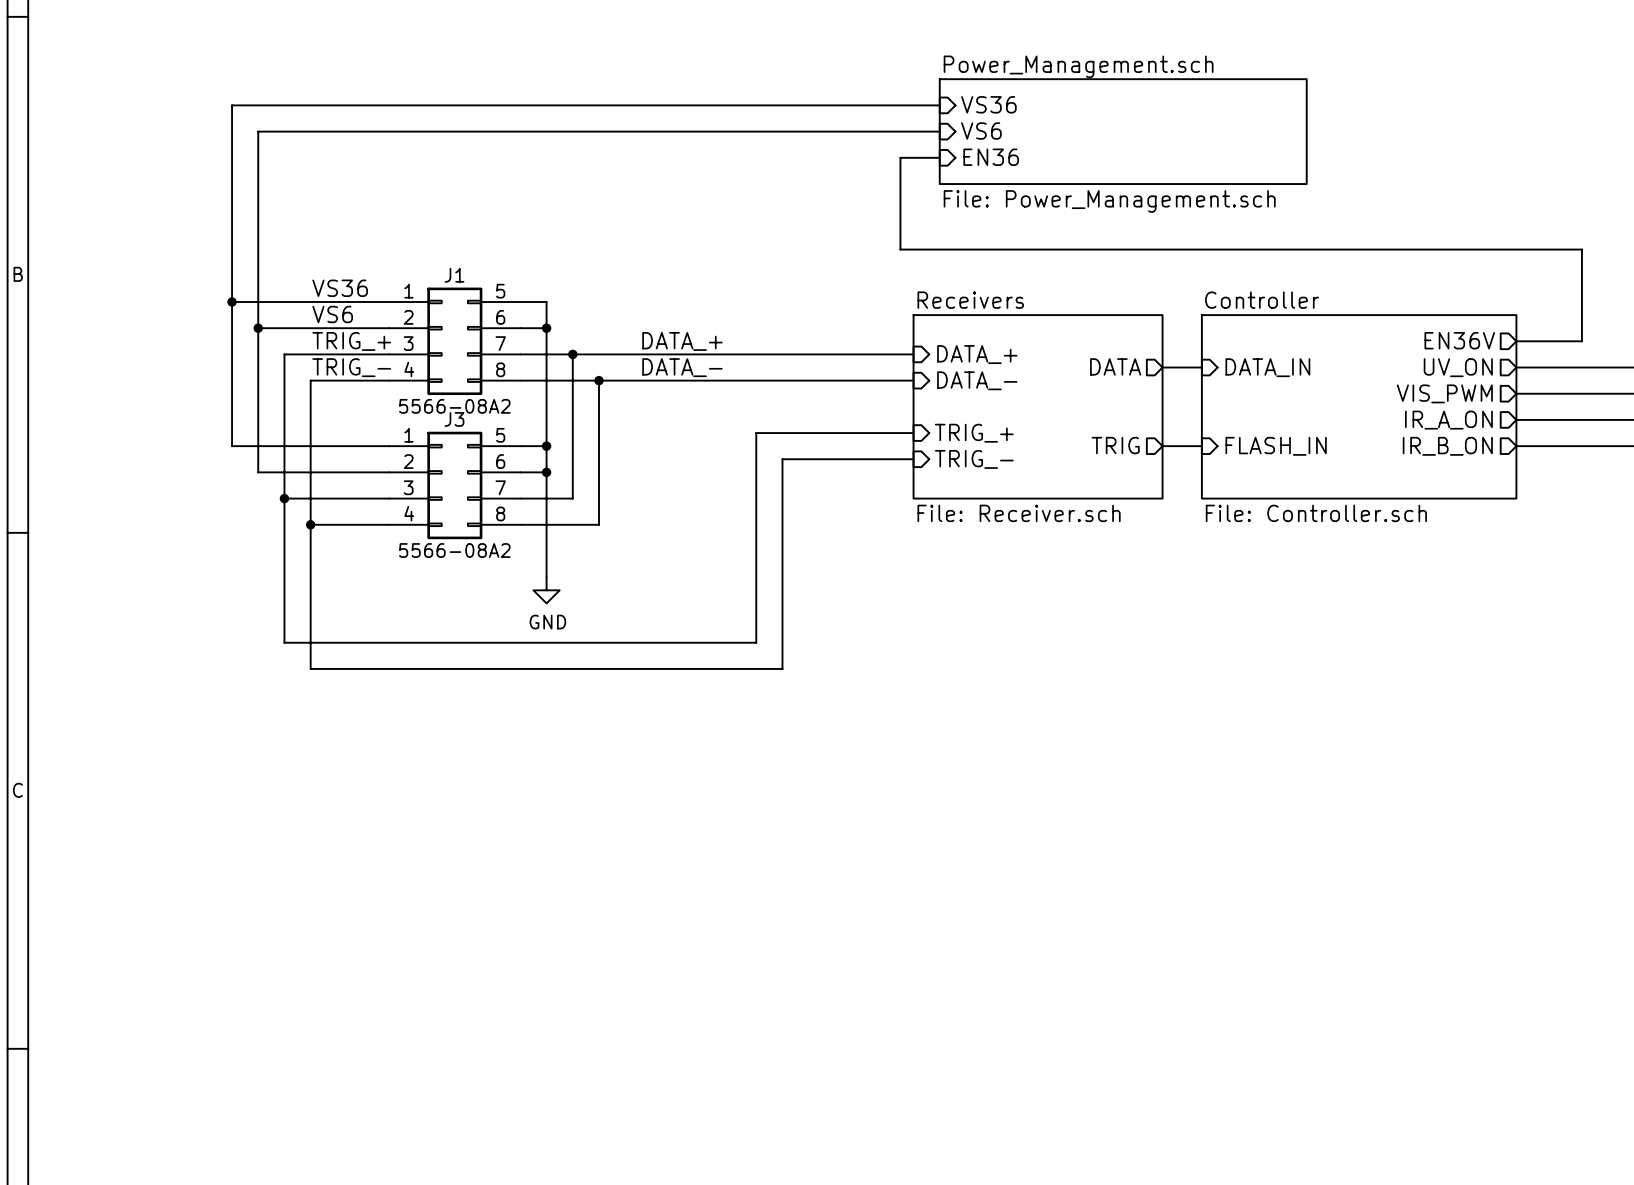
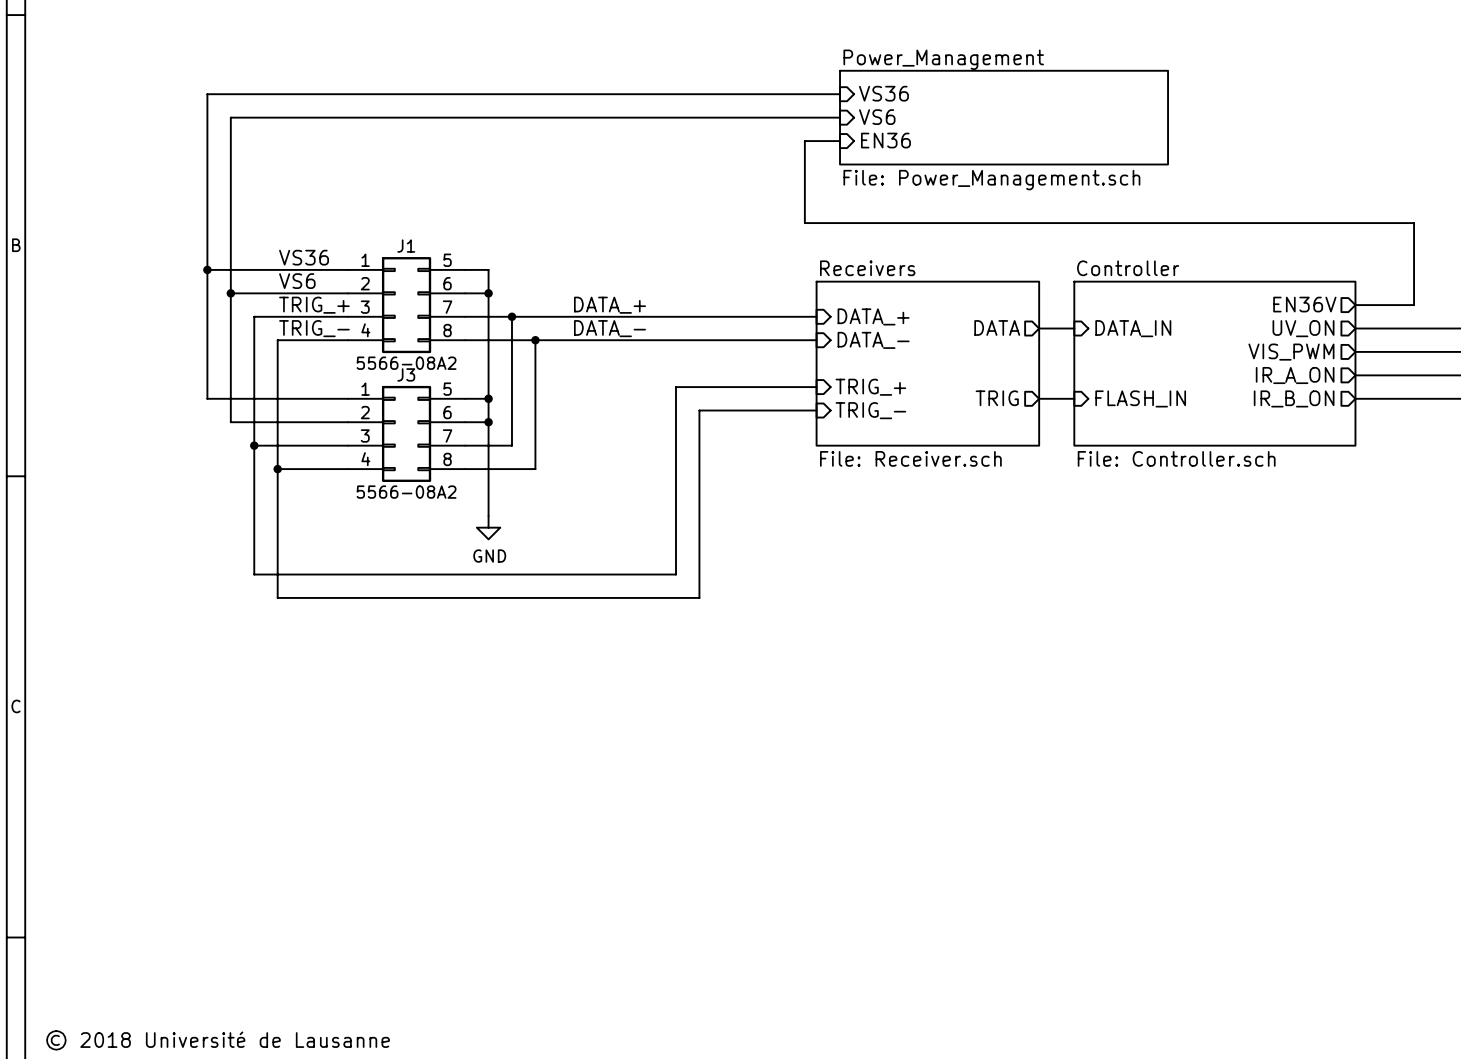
sheet Power_Management.sch name: Power_Management.sch (1078, 66) -> Power_Management (943, 59)
text: none -> © 2018 Université de Lausanne (218, 1040)

